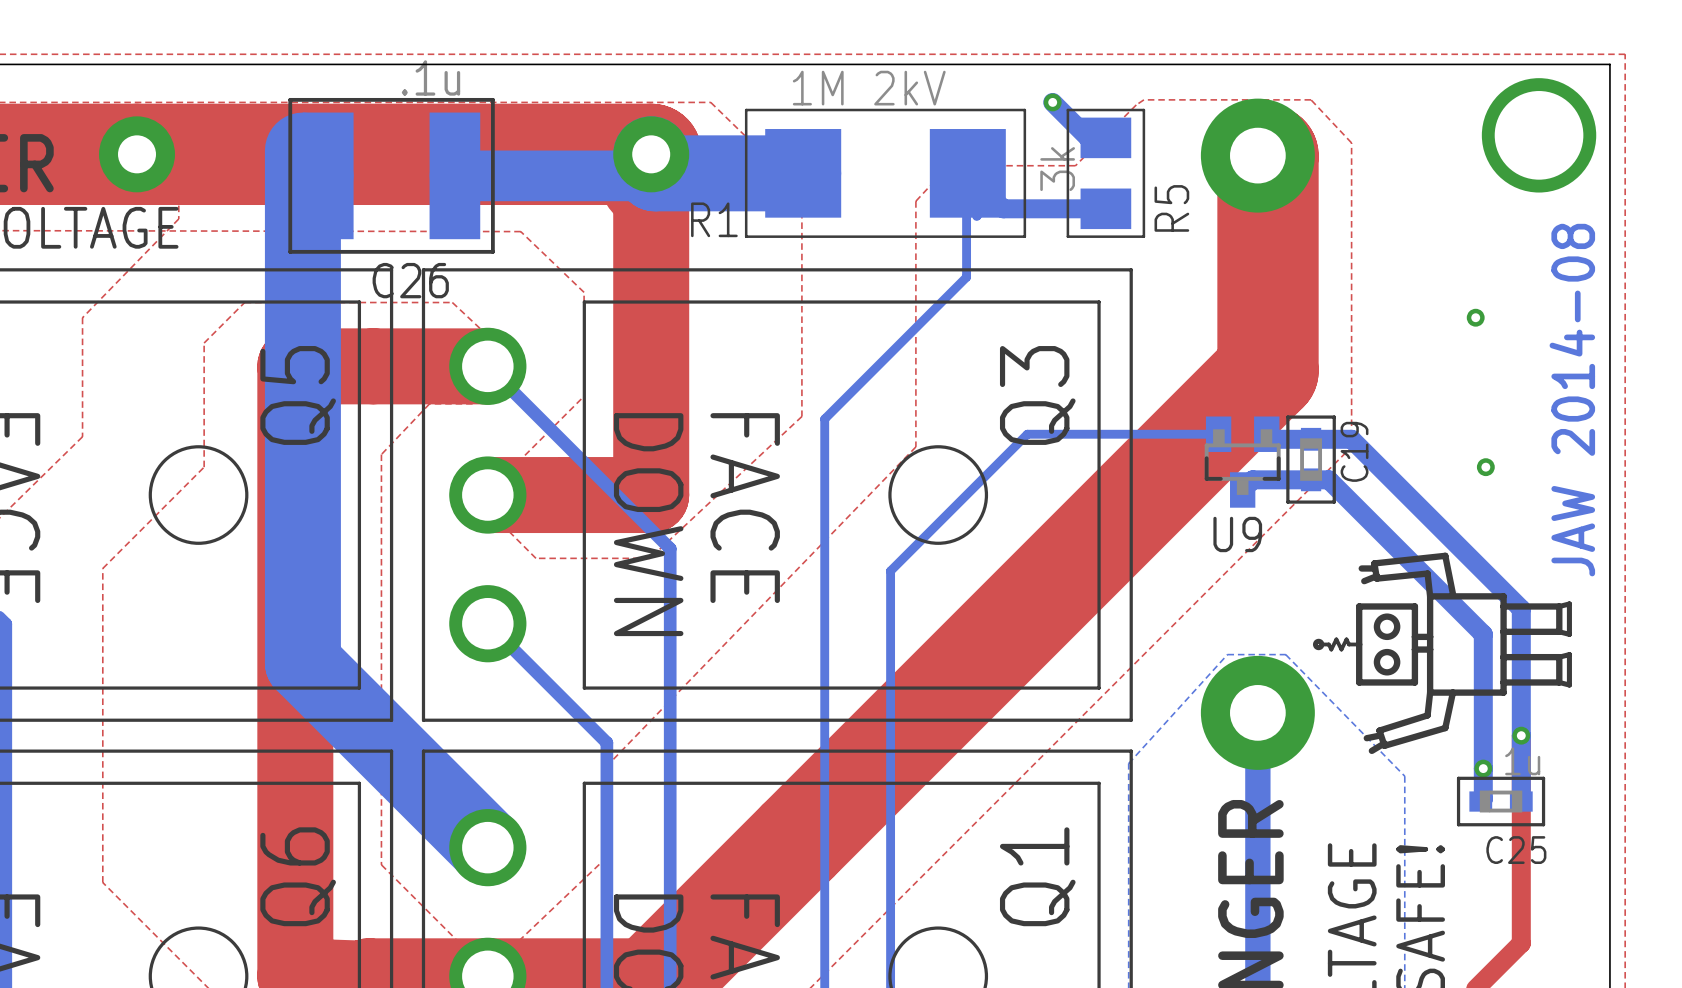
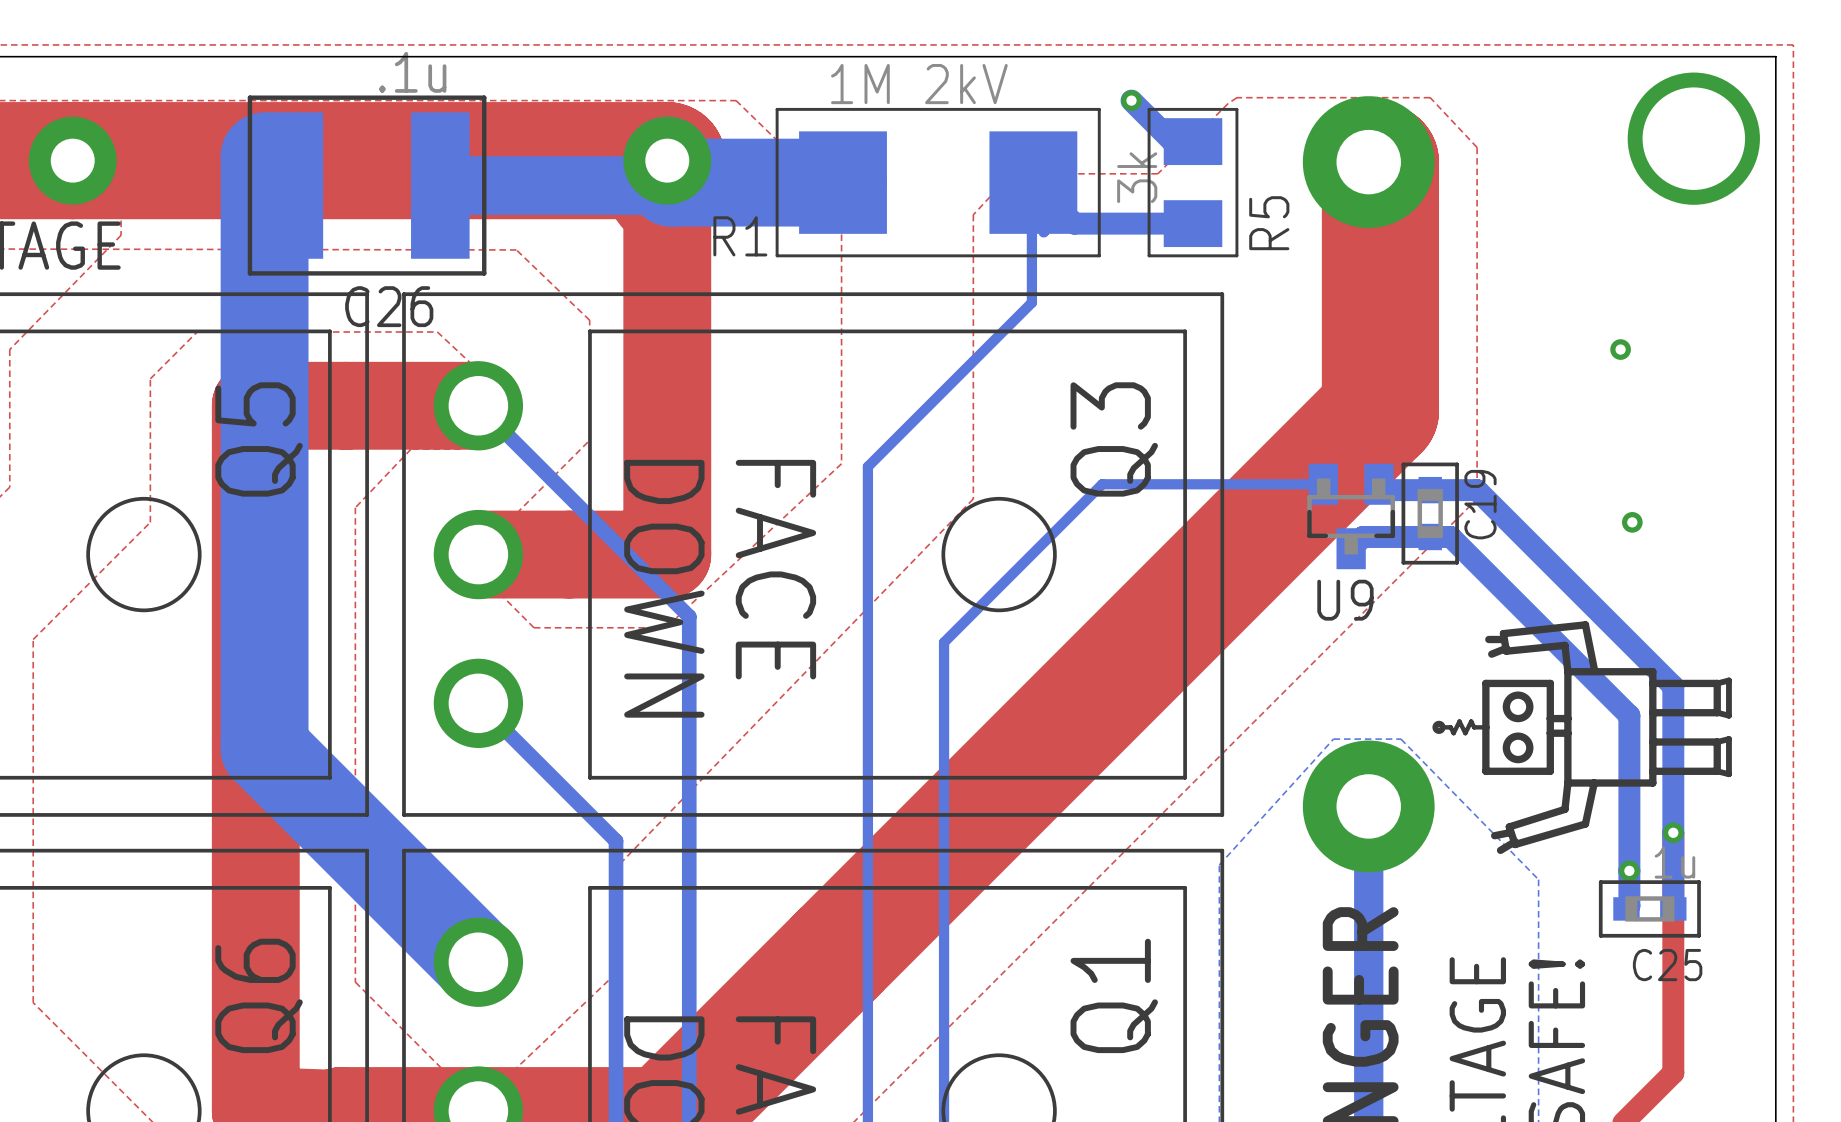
text: JAW 2014-08 (1572, 400) -> none

